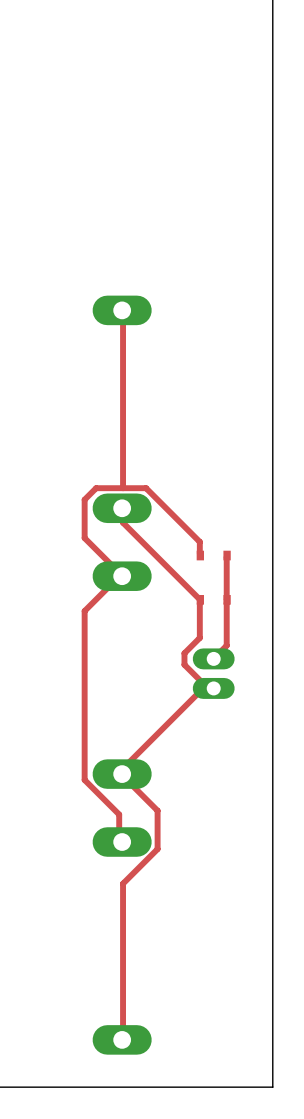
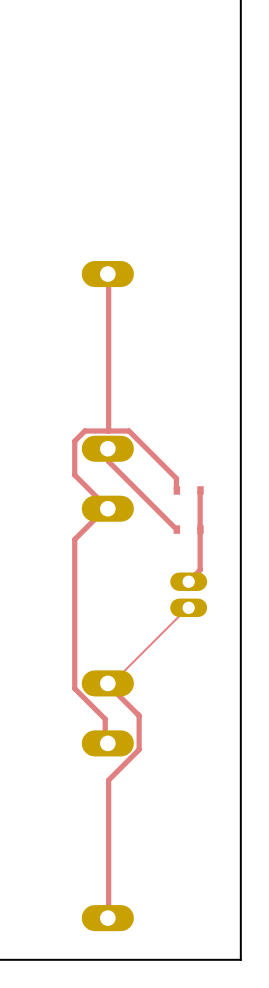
top track: (199, 599) (199, 637) (184, 653) (184, 664) (211, 691) (213, 688) (203, 687) (119, 772) (123, 776) -> (187, 607) (109, 686) (107, 683) (108, 685)

